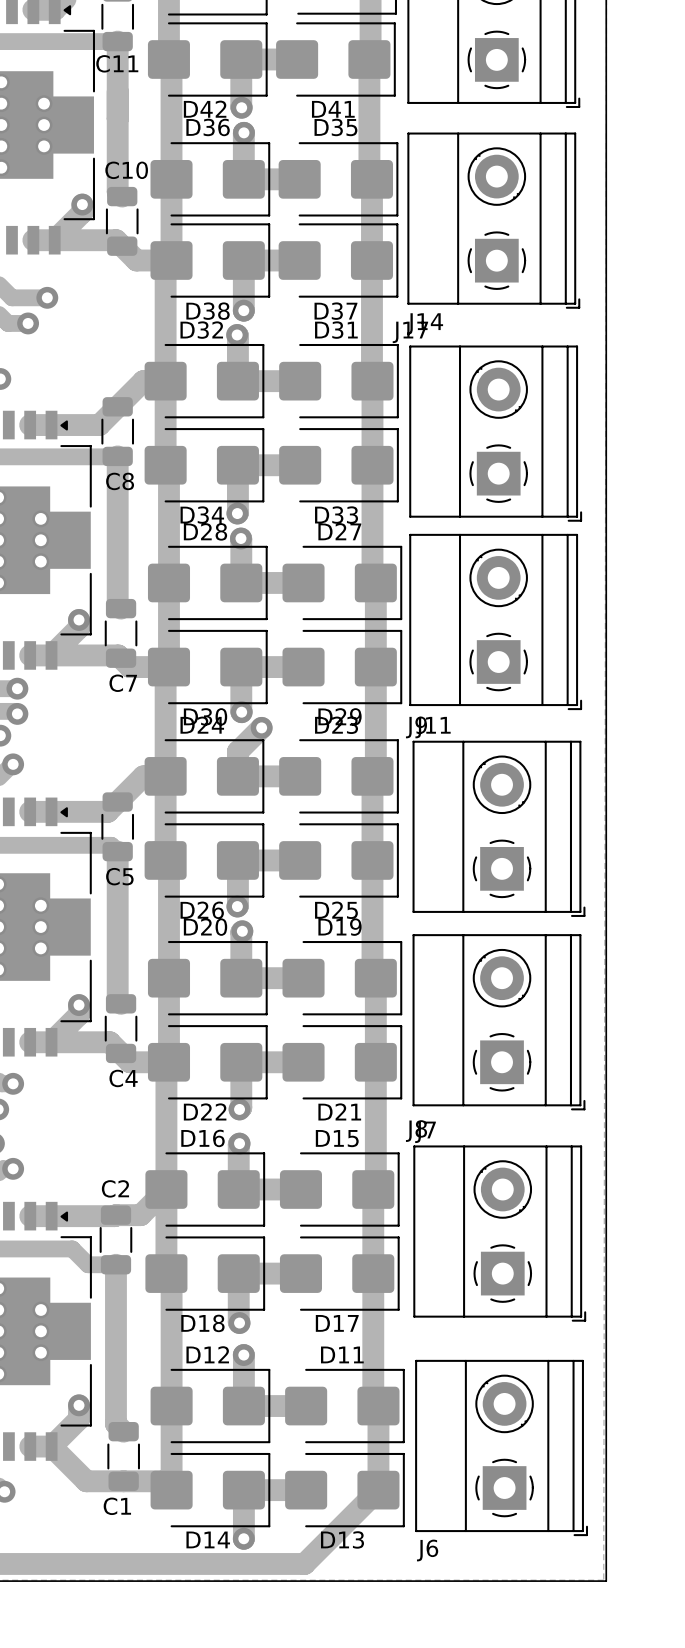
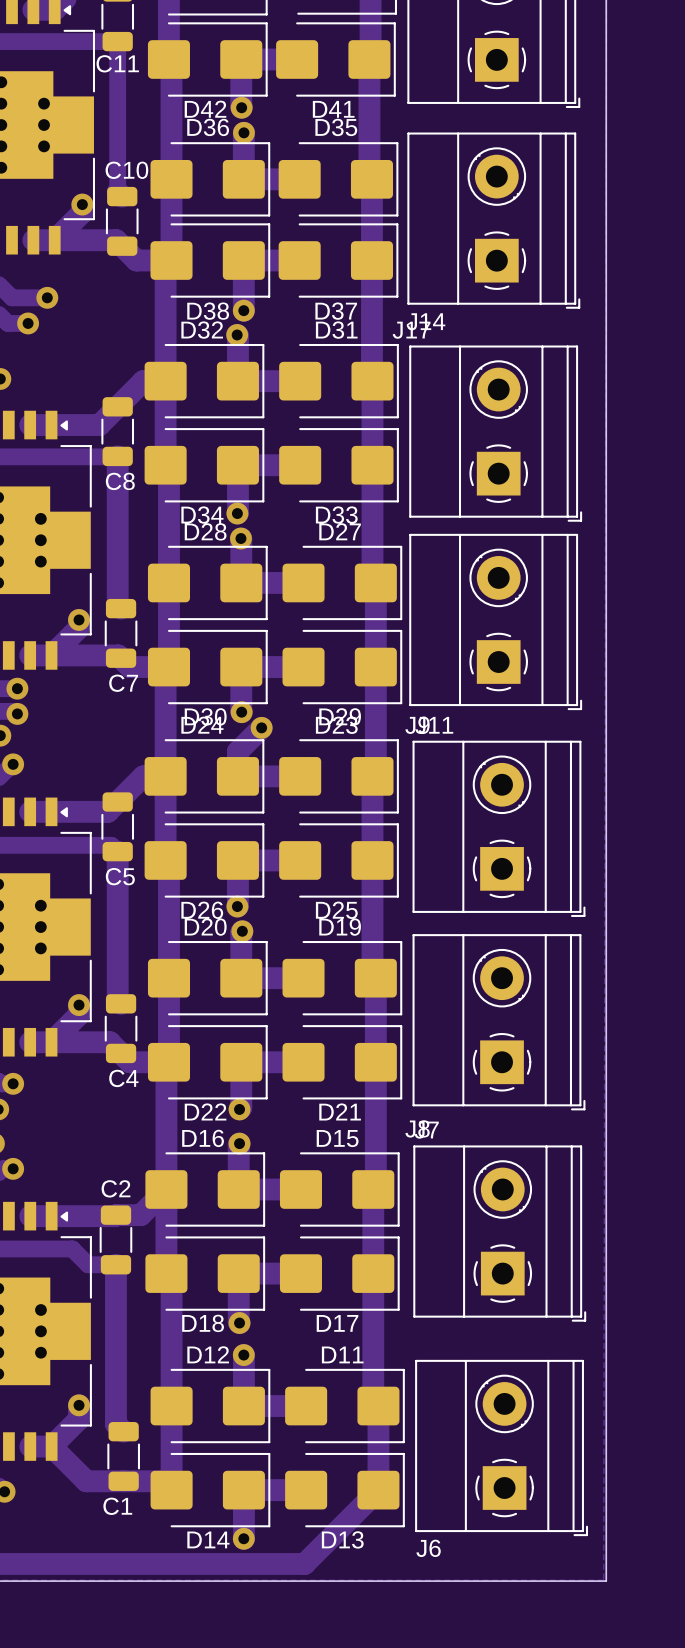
track width: thick (117, 41) (117, 192) -> thin (117, 41) (117, 192)

